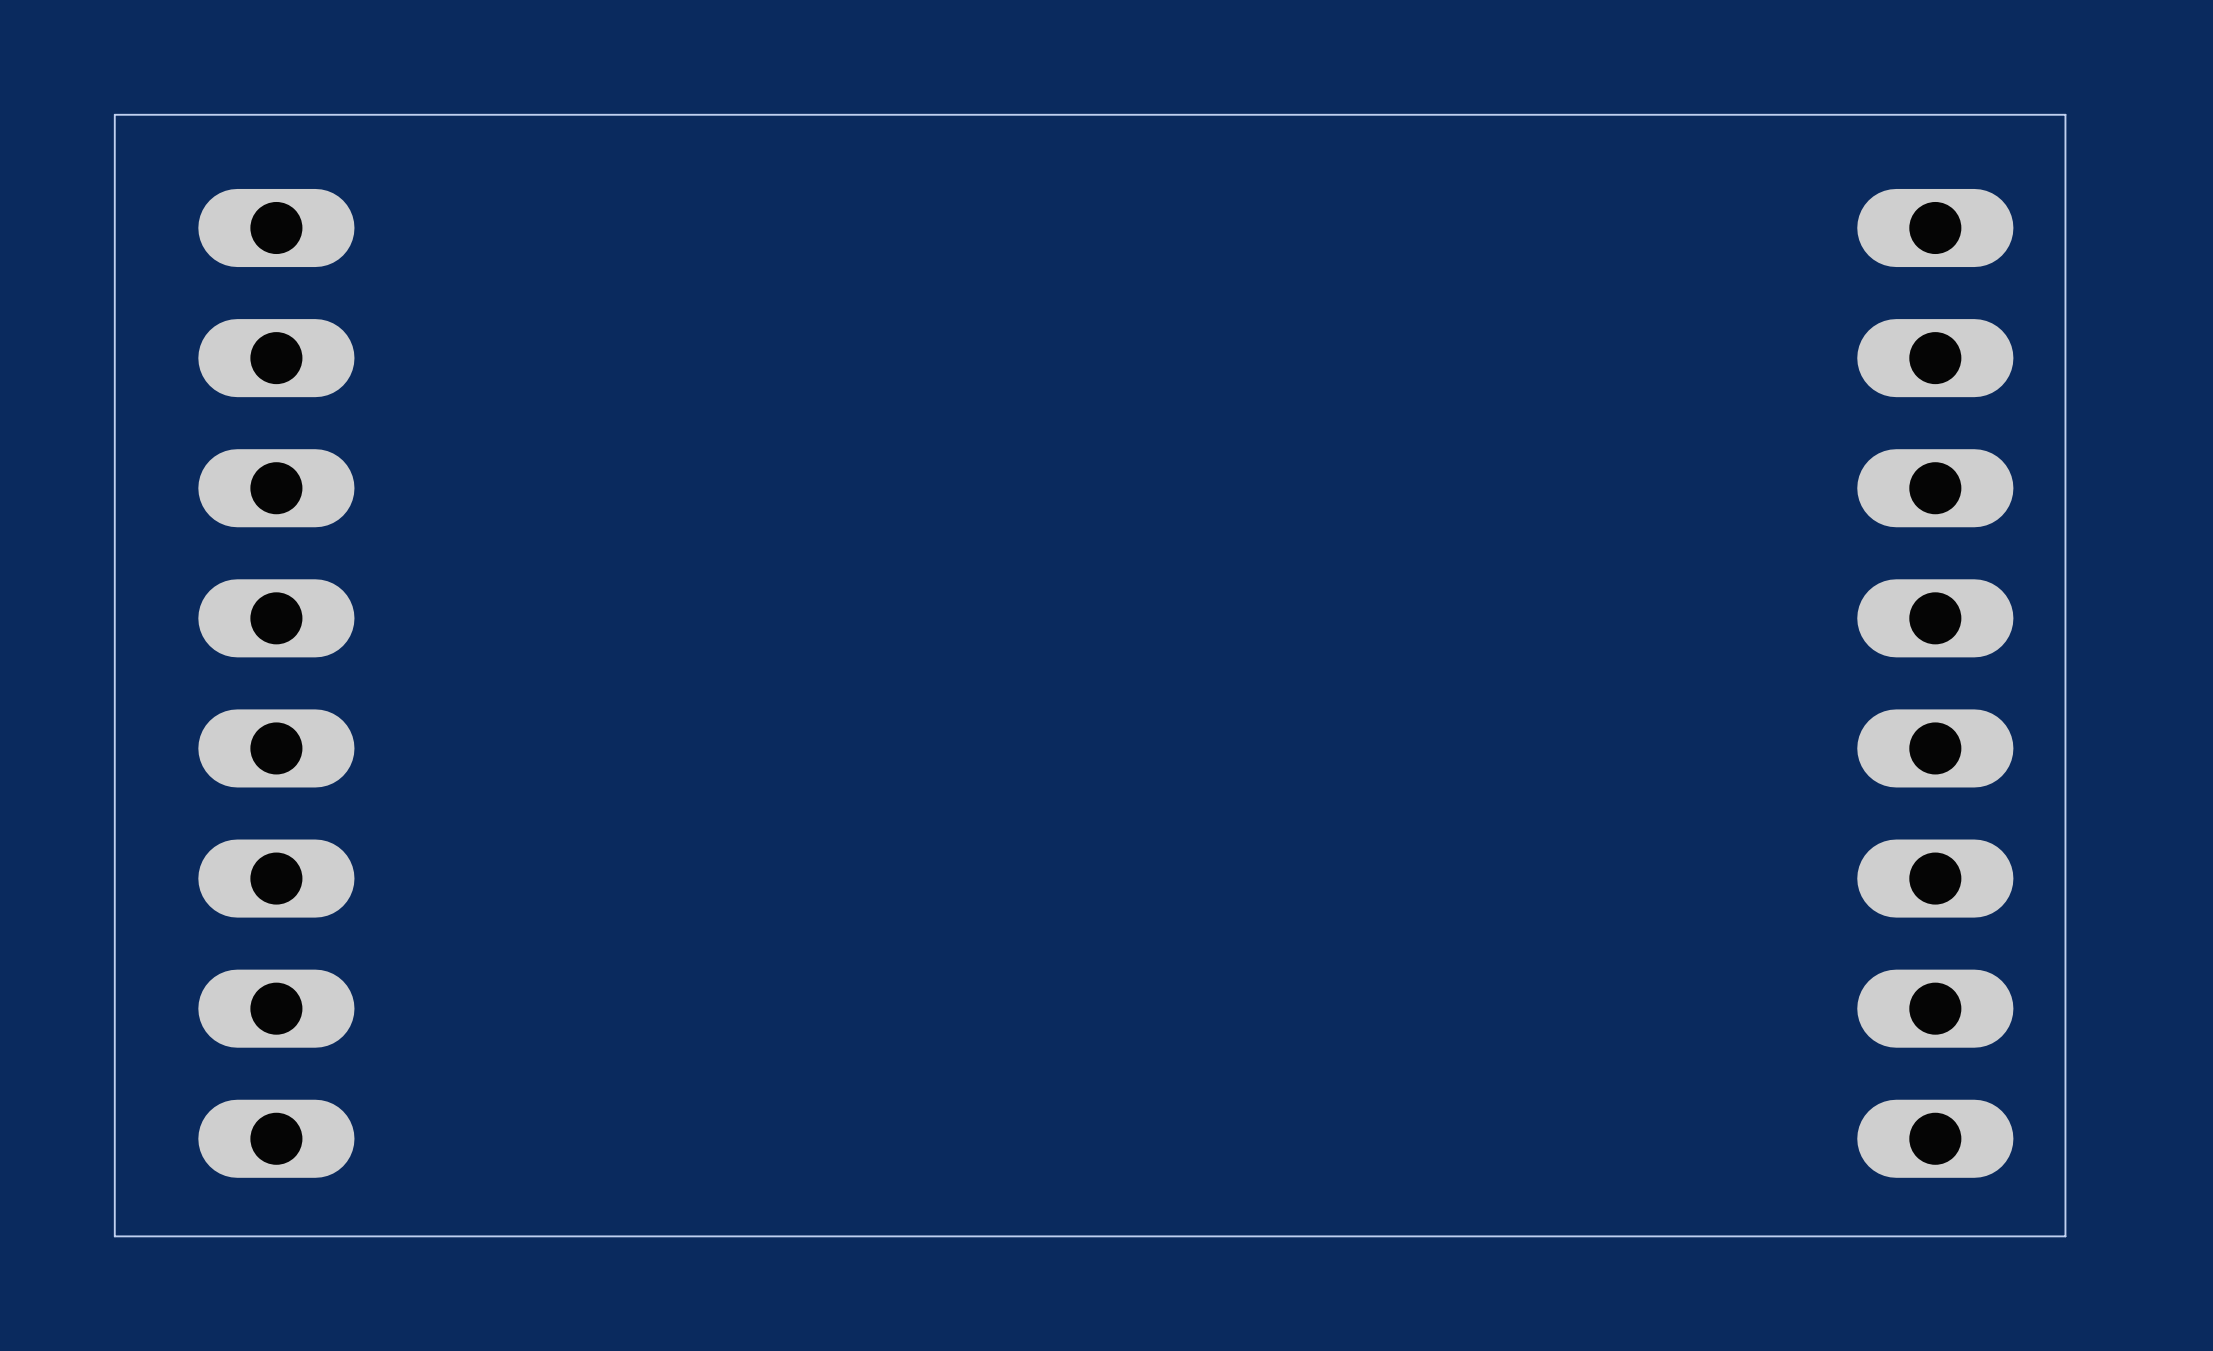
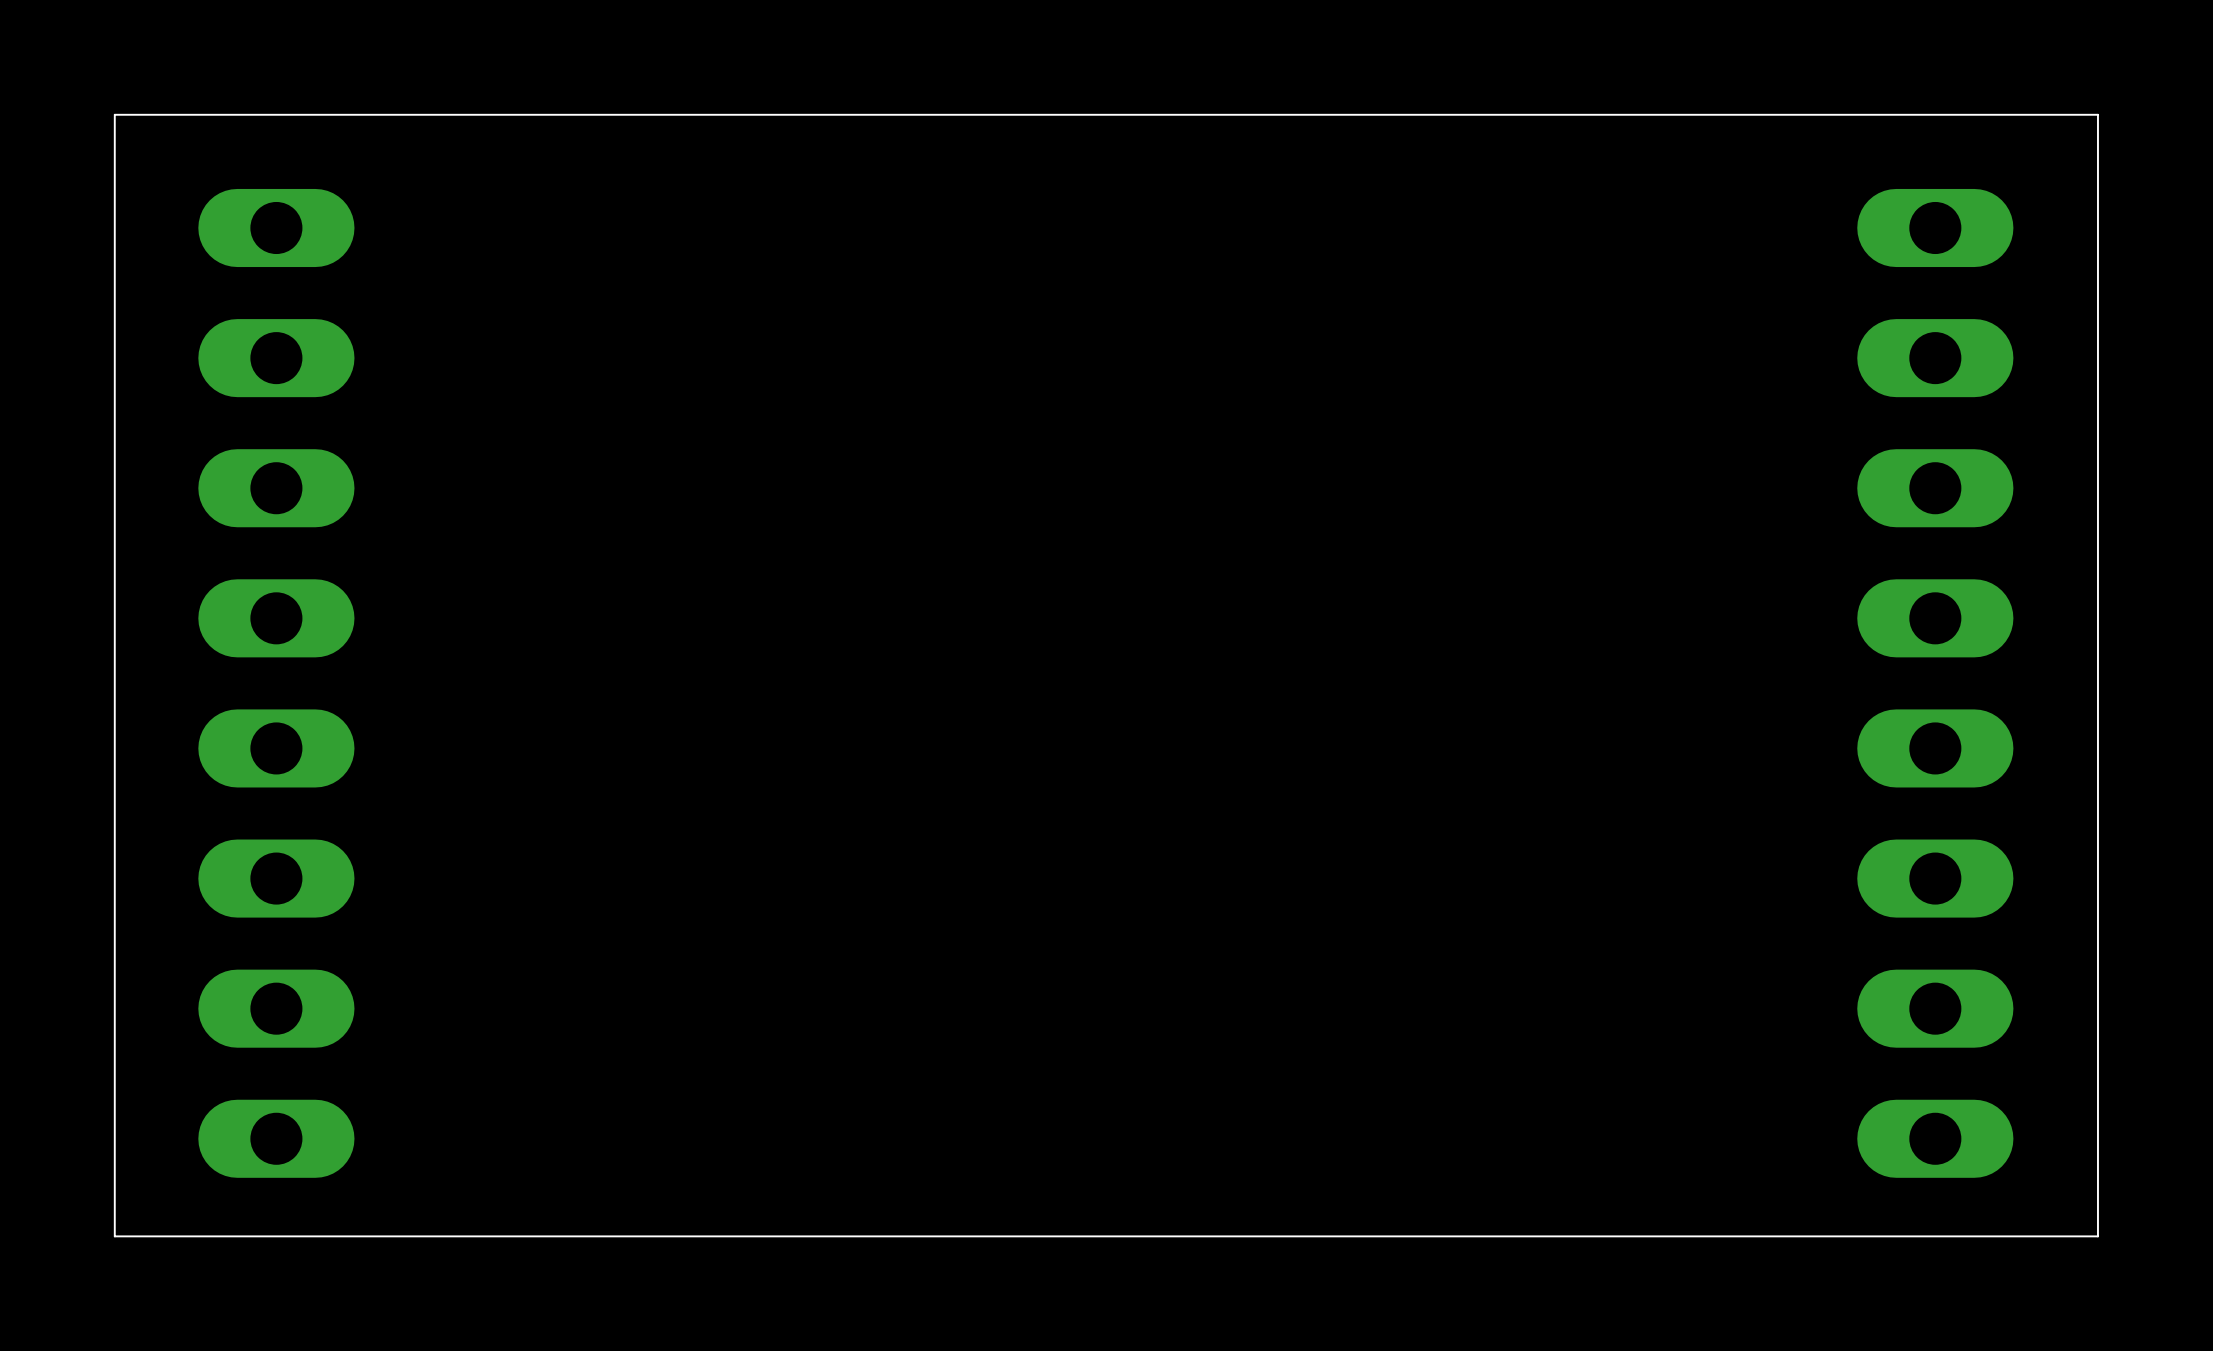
board edge: (2065, 114) (2065, 1236) -> (2065, 114) (2097, 114) (2097, 1236) (2065, 1236)

